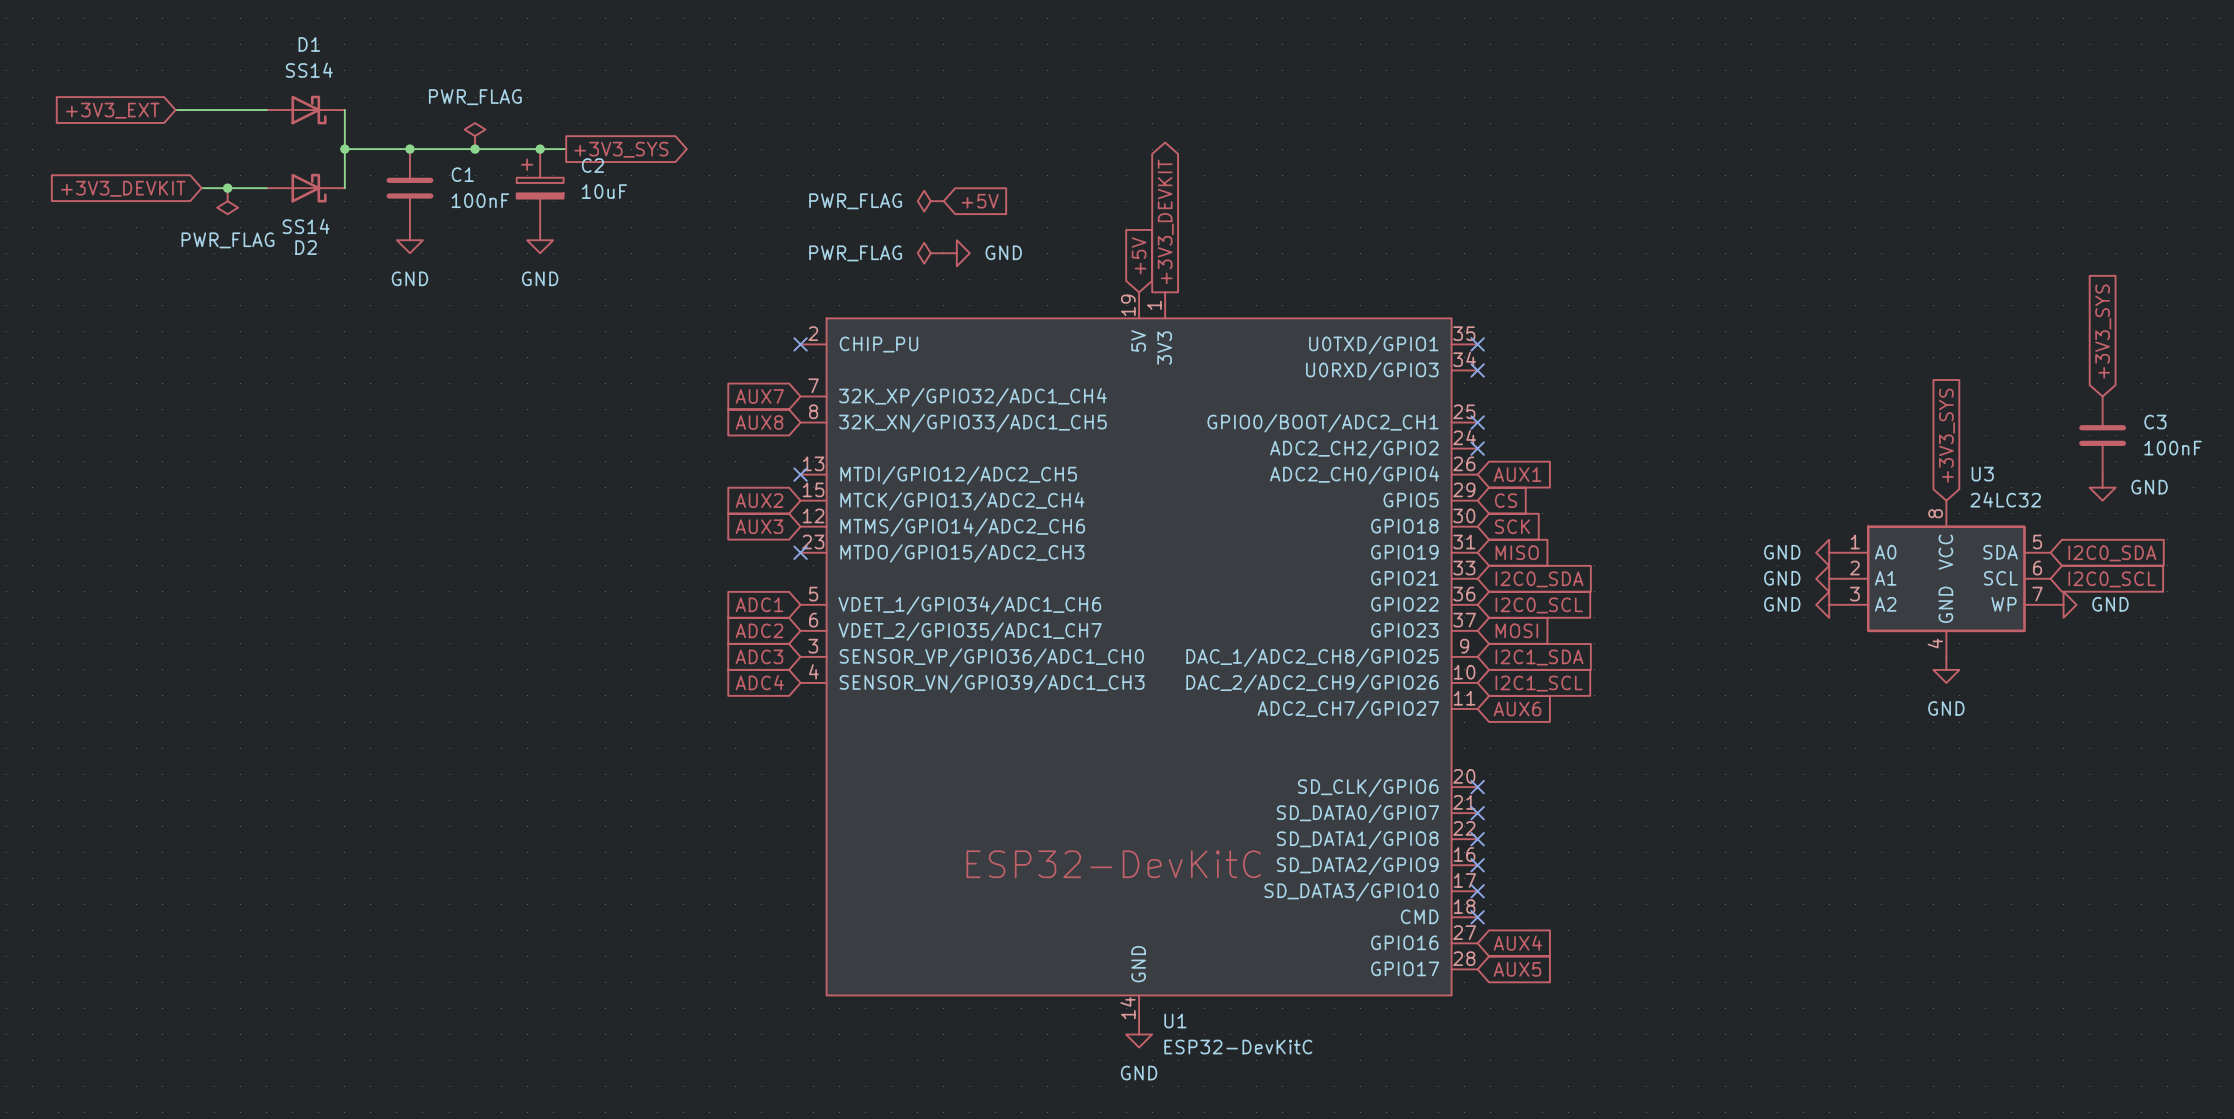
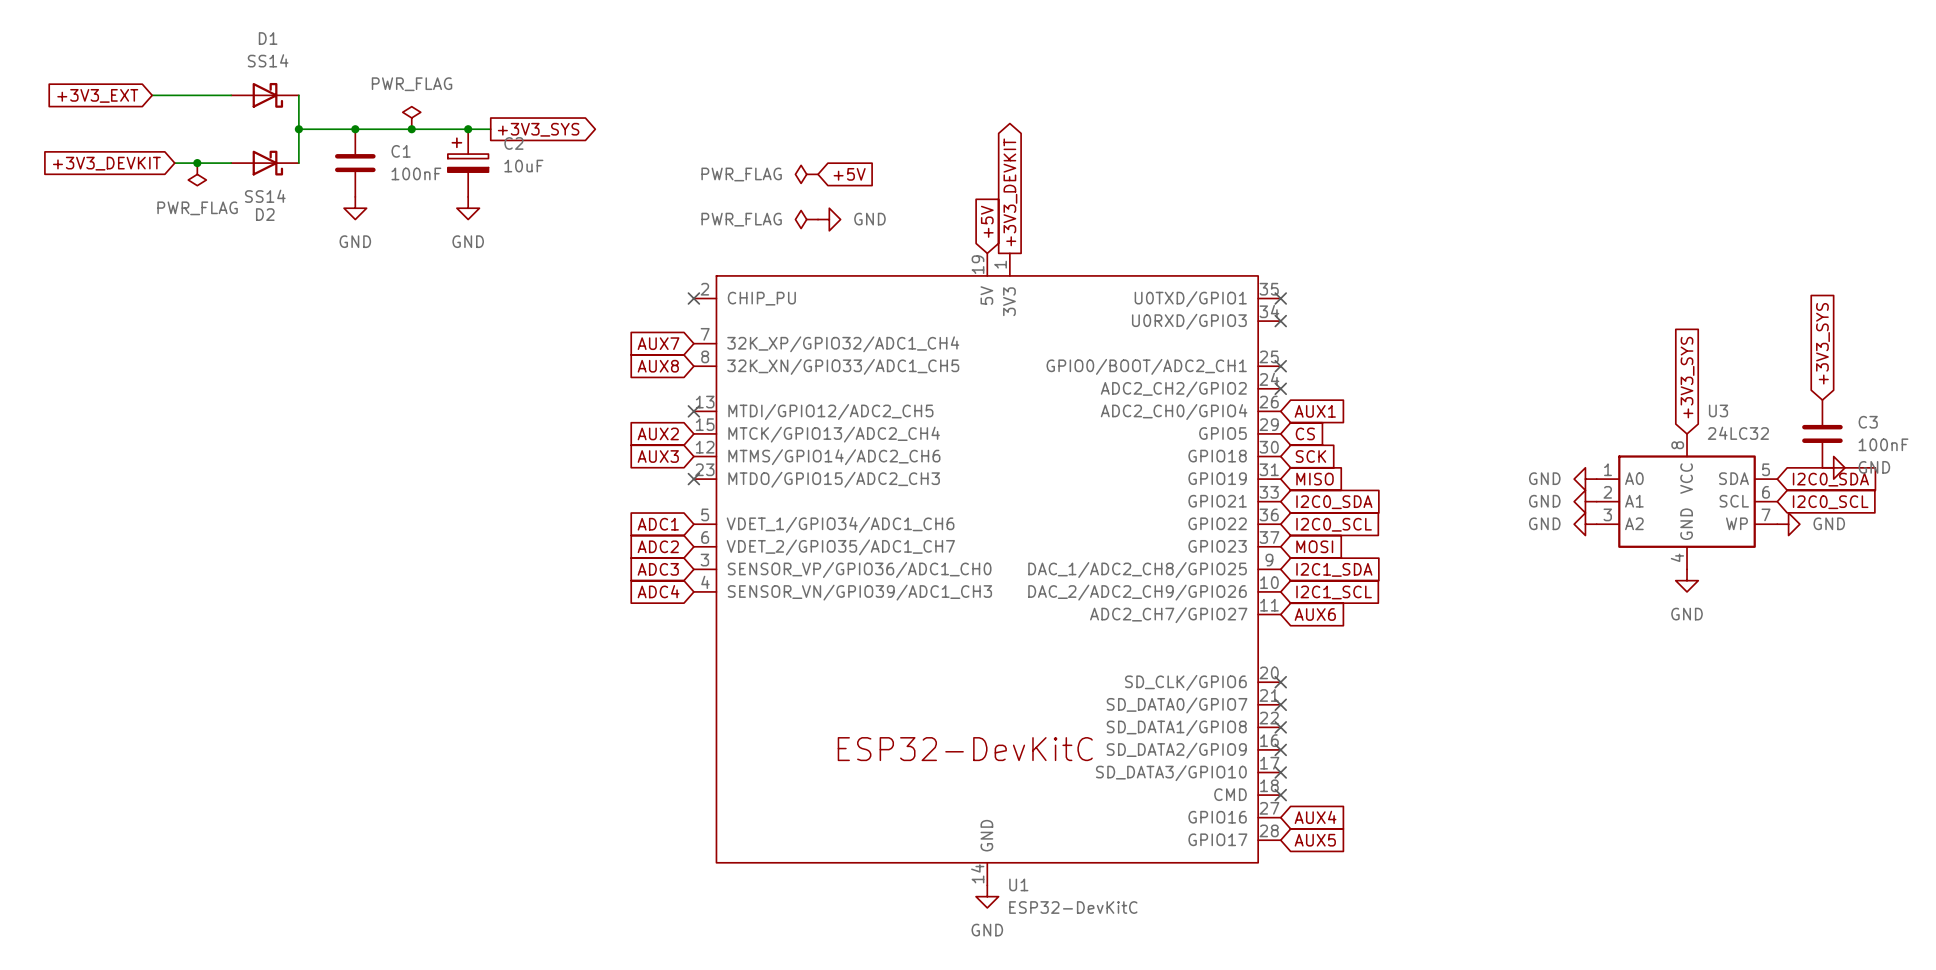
global label position: +3V3_SYS (2103, 331) -> +3V3_SYS (1822, 343)
C3 position: (2102, 435) -> (1822, 433)
power symbol rotation: 0° (2102, 487) -> 90° counterclockwise (1833, 467)
power symbol position: GND (2102, 487) -> GND (1833, 467)

